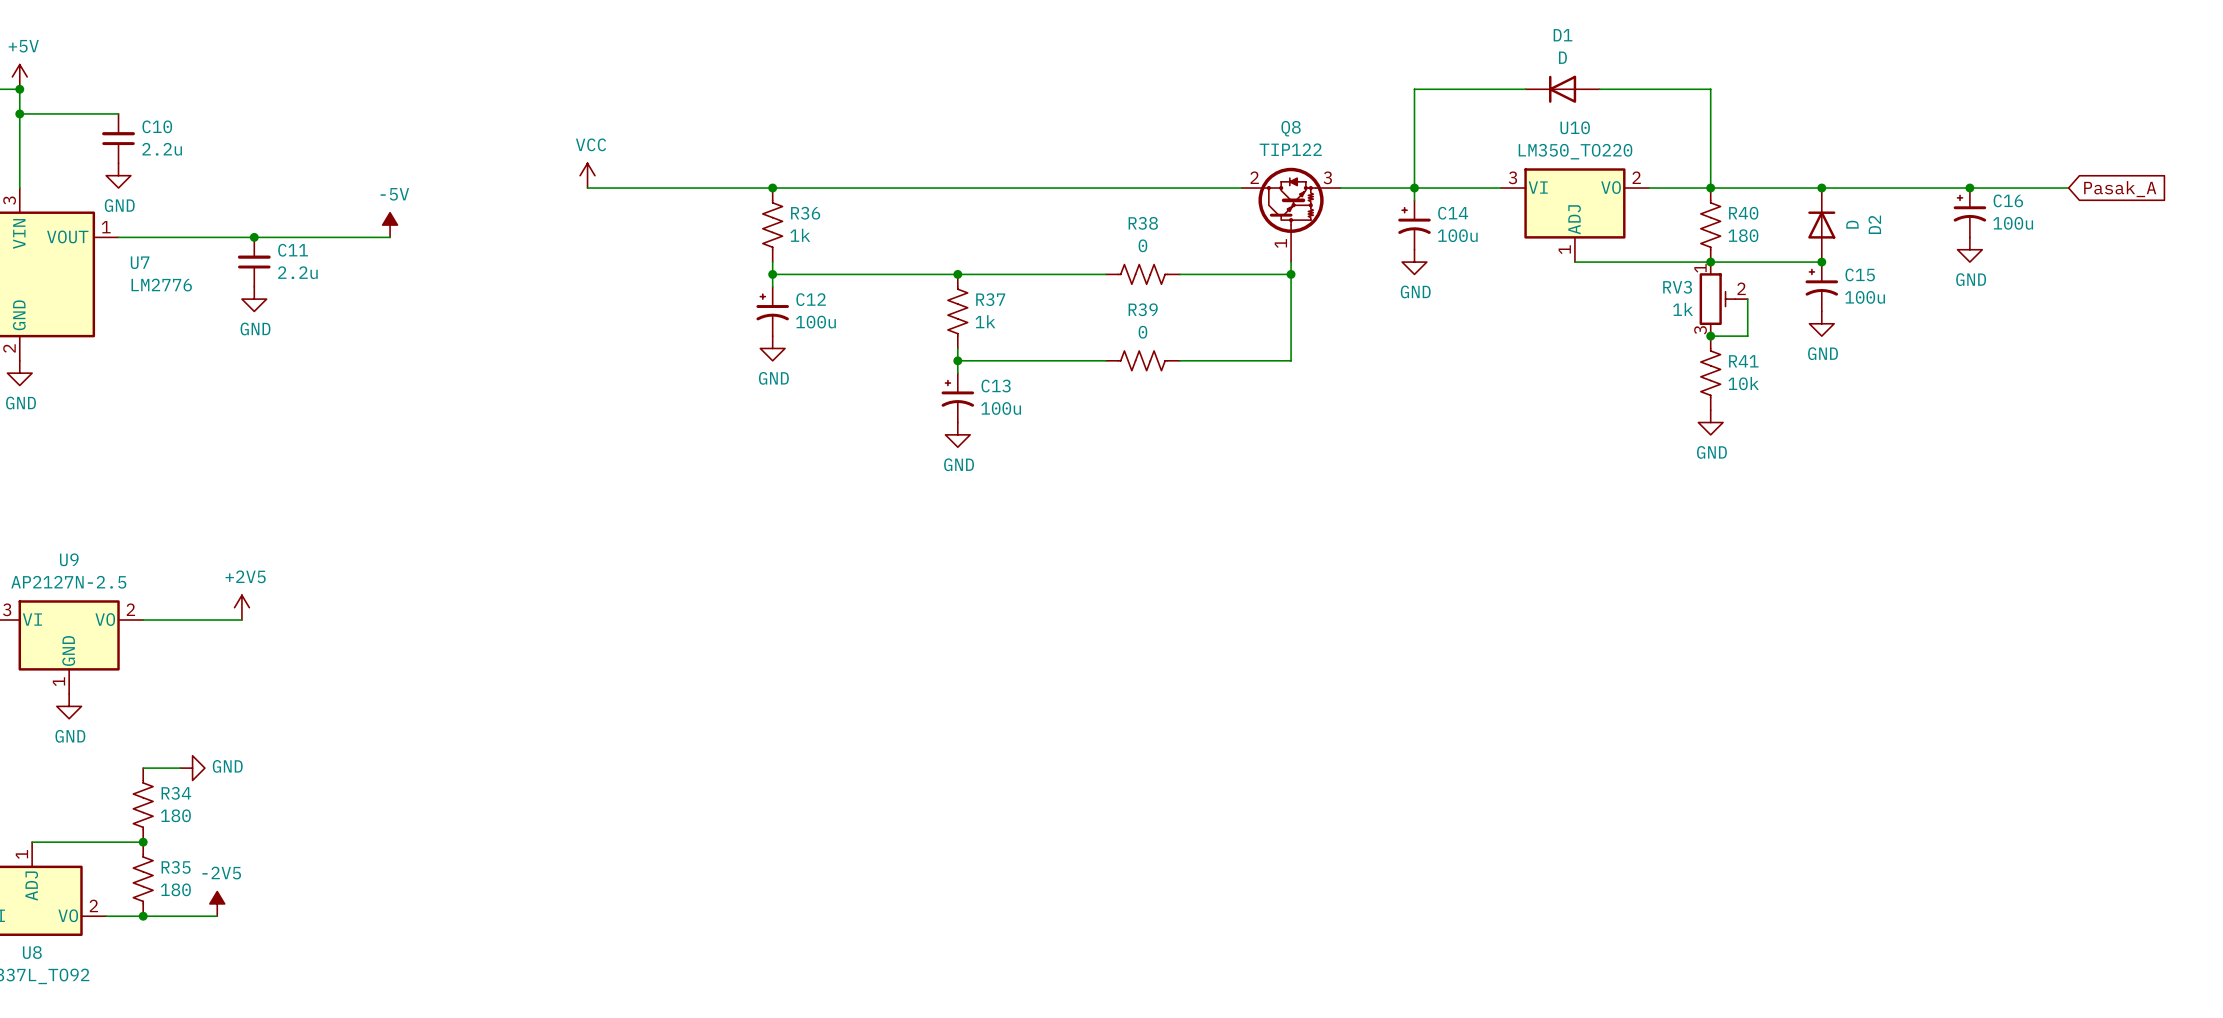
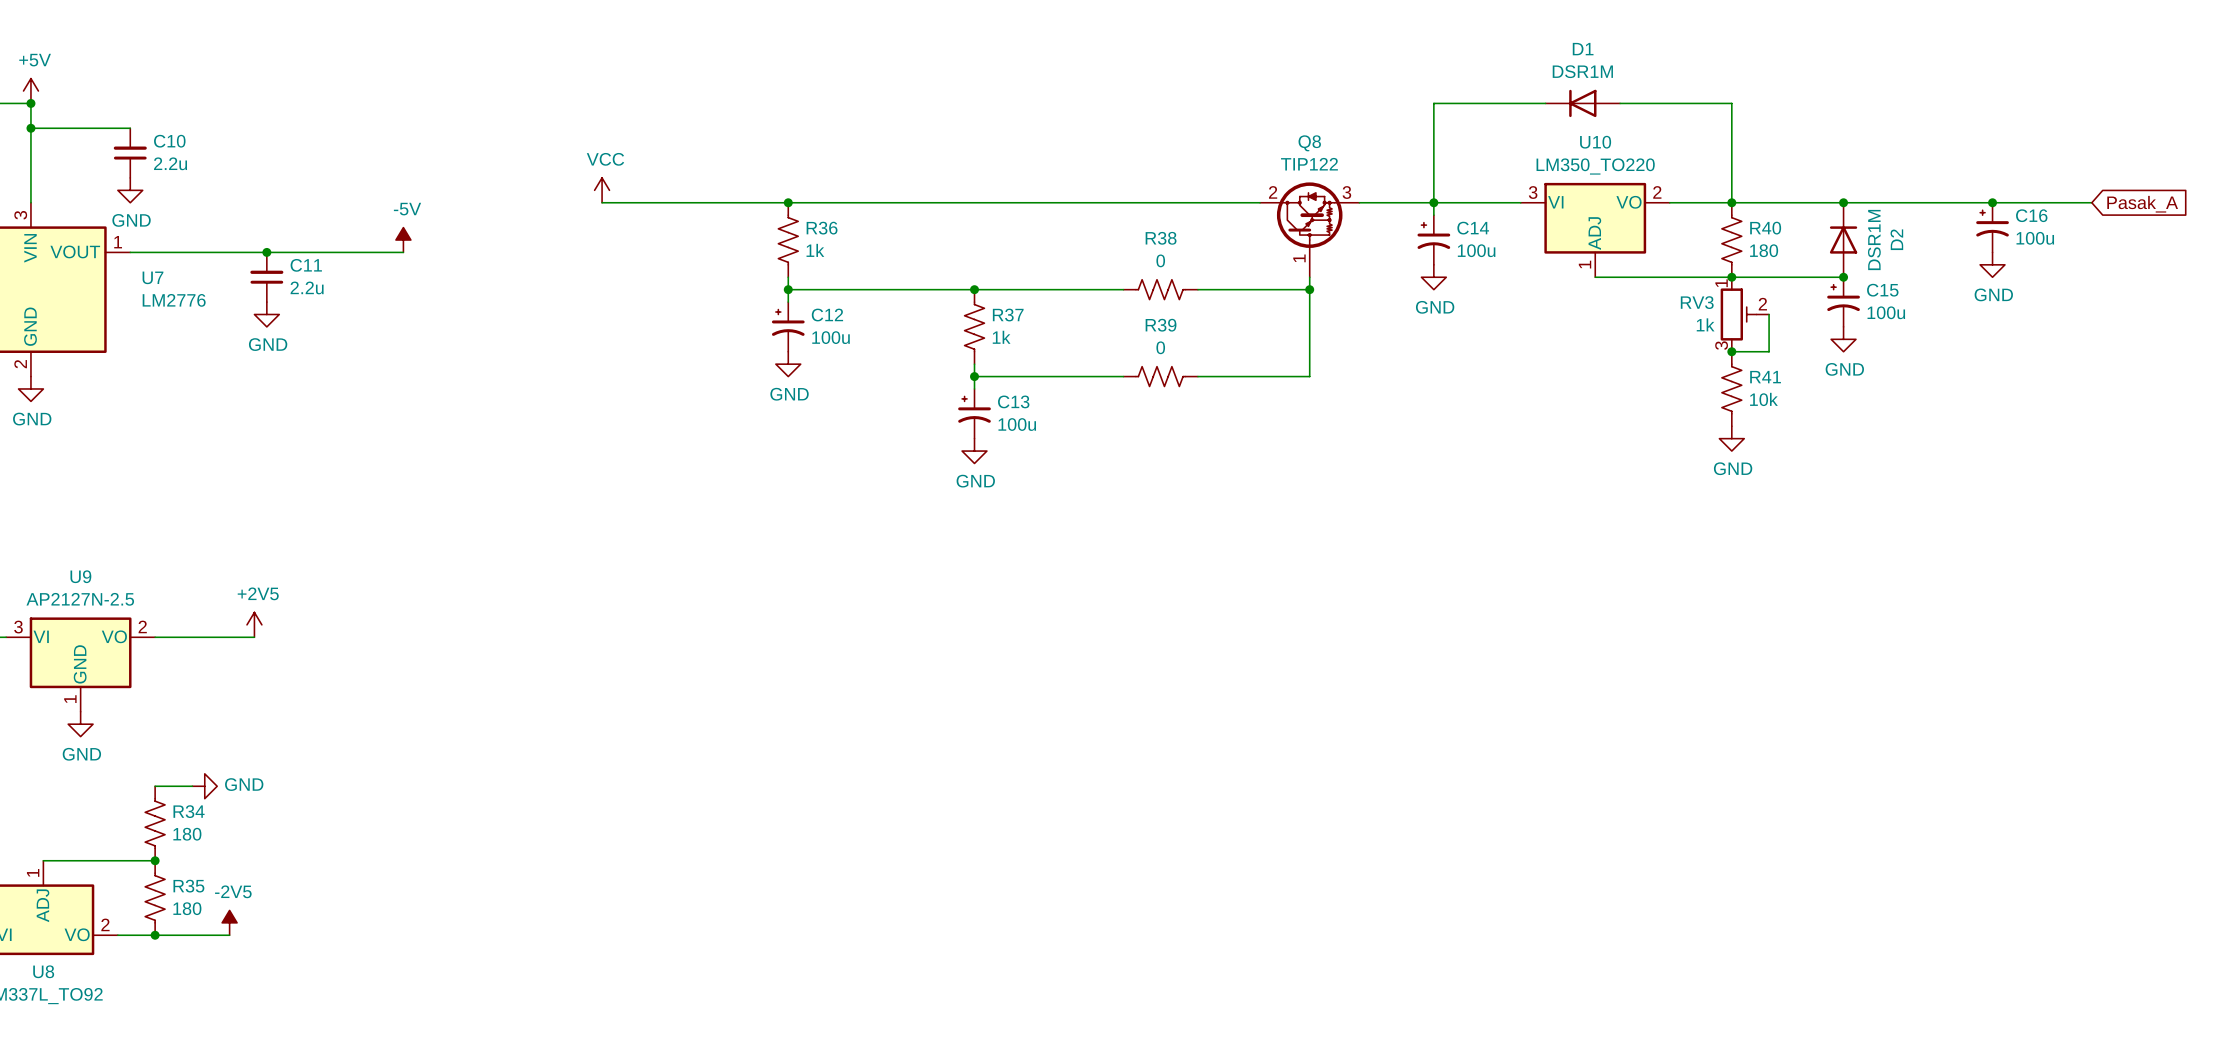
D1 value: D (1562, 57) -> DSR1M (1582, 71)
D2 value: D (1852, 224) -> DSR1M (1874, 240)

